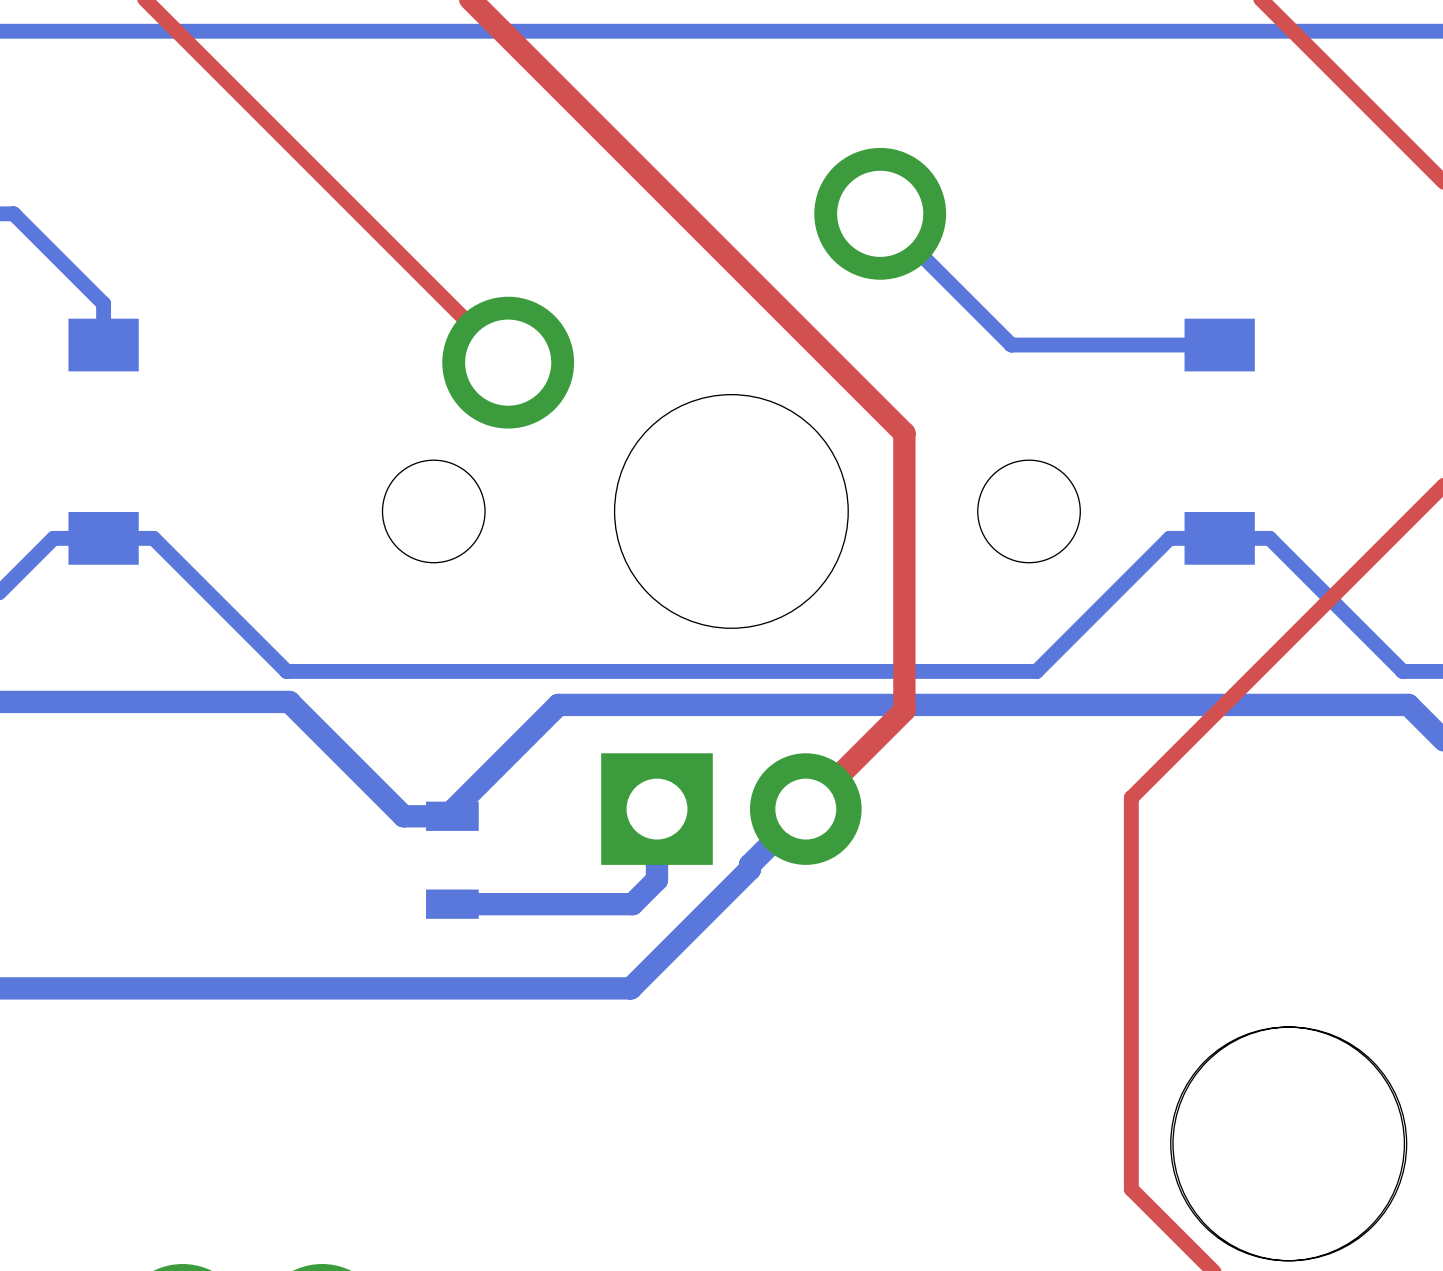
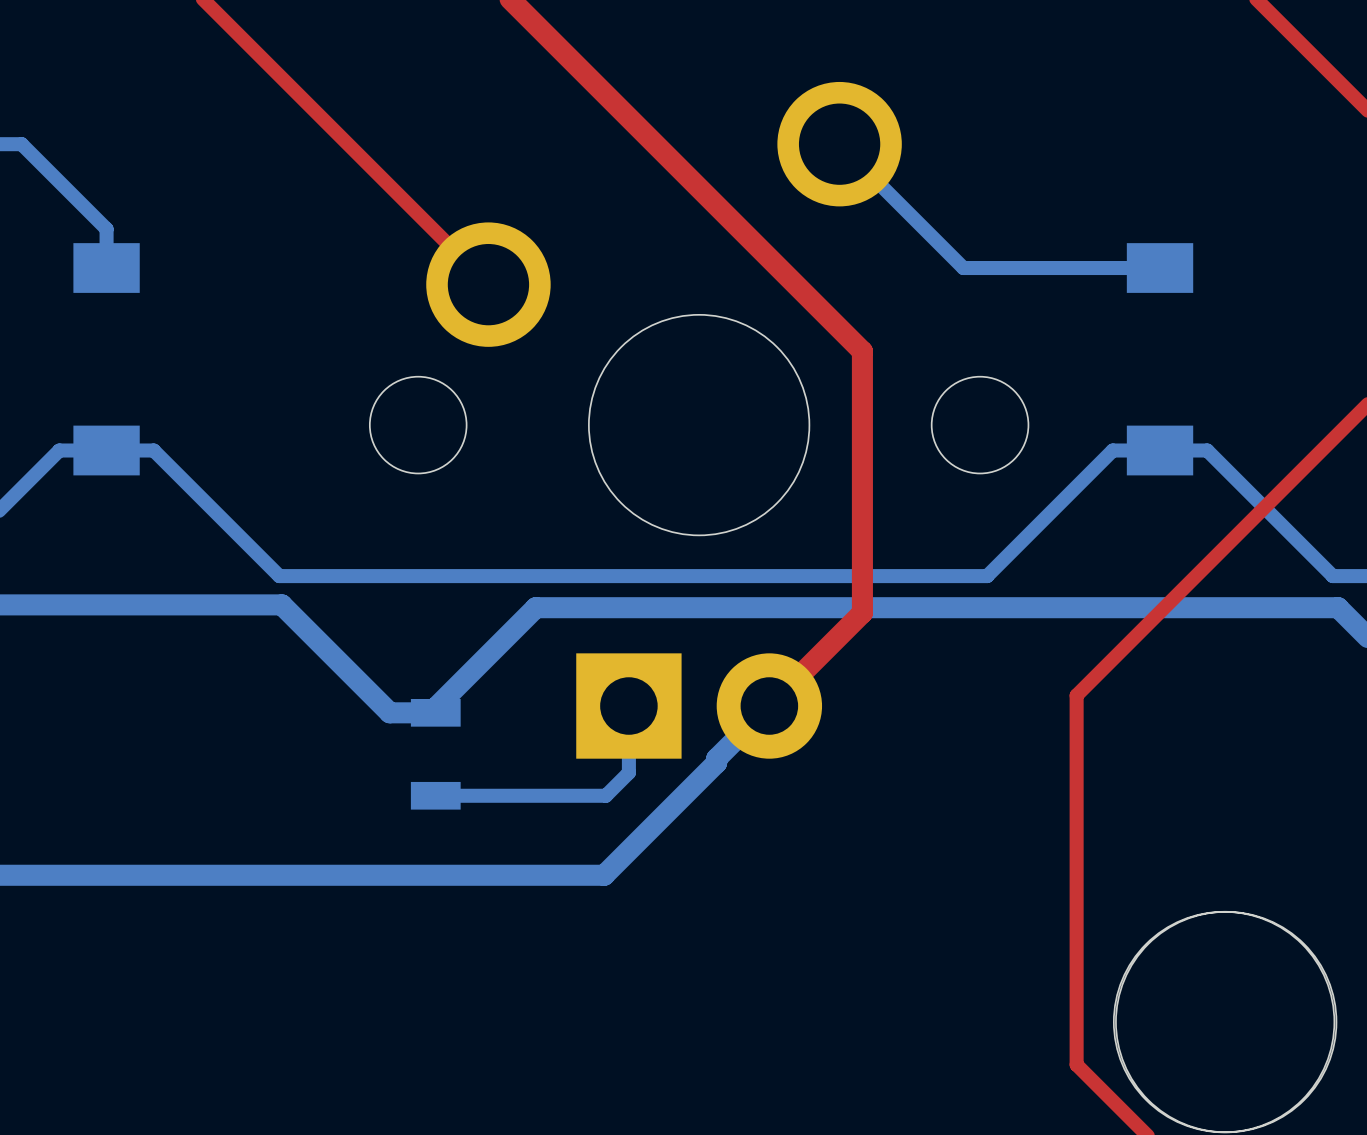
bottom track width: thick (656, 809) (656, 879) (632, 904) (452, 904) -> thin (628, 706) (628, 772) (605, 795) (435, 795)

